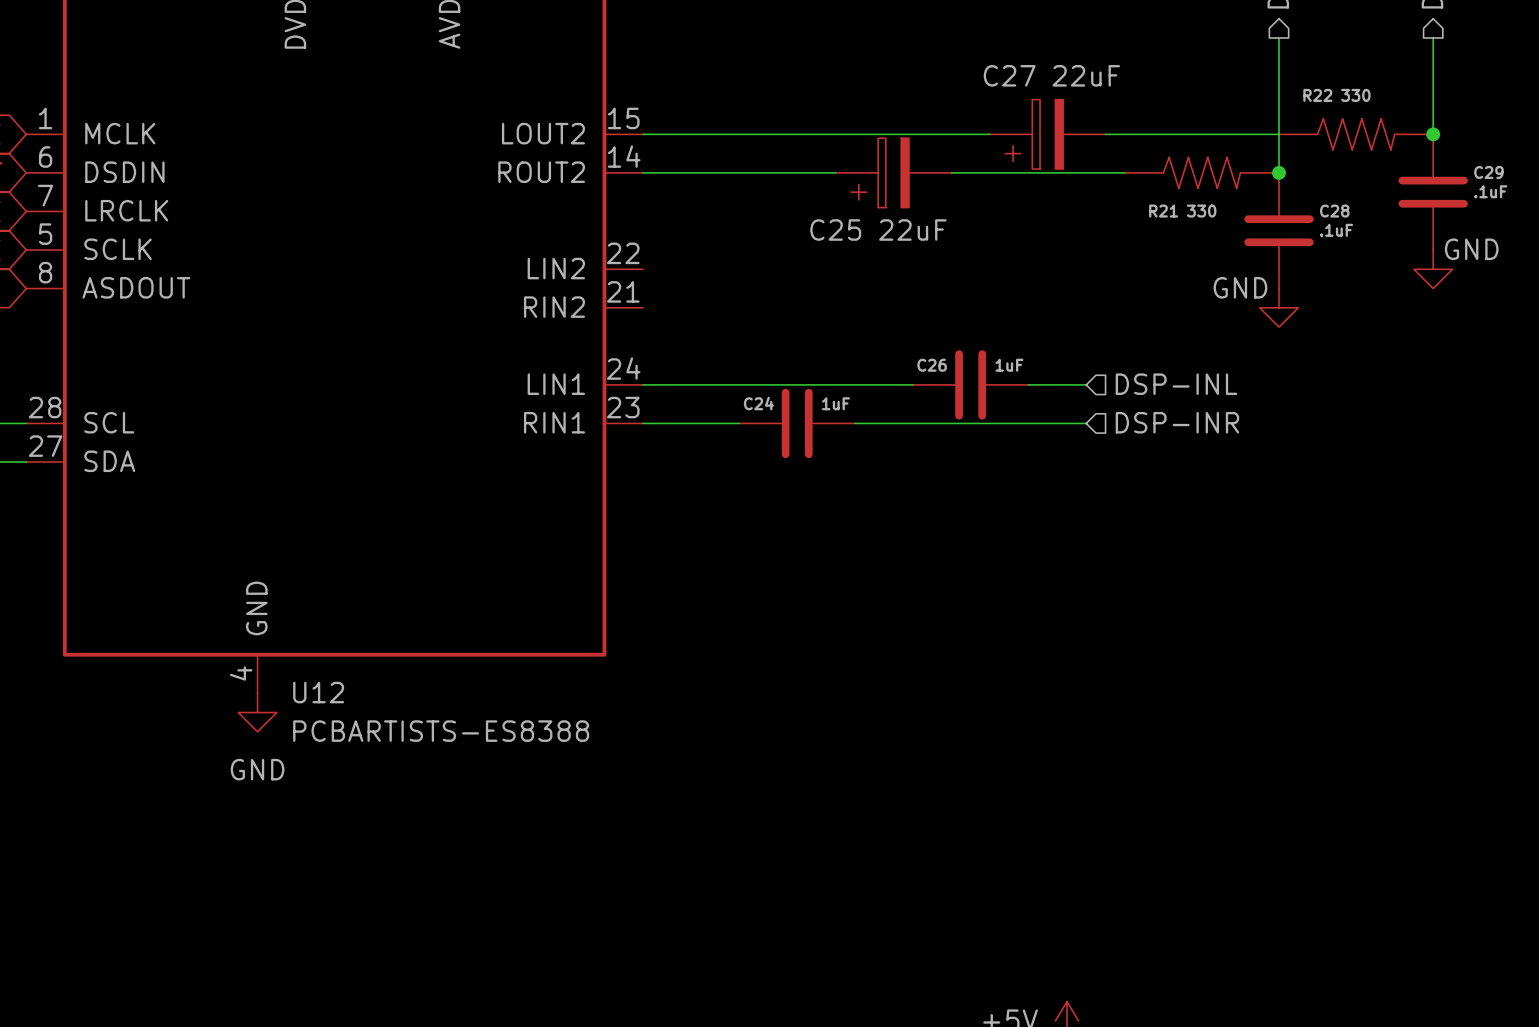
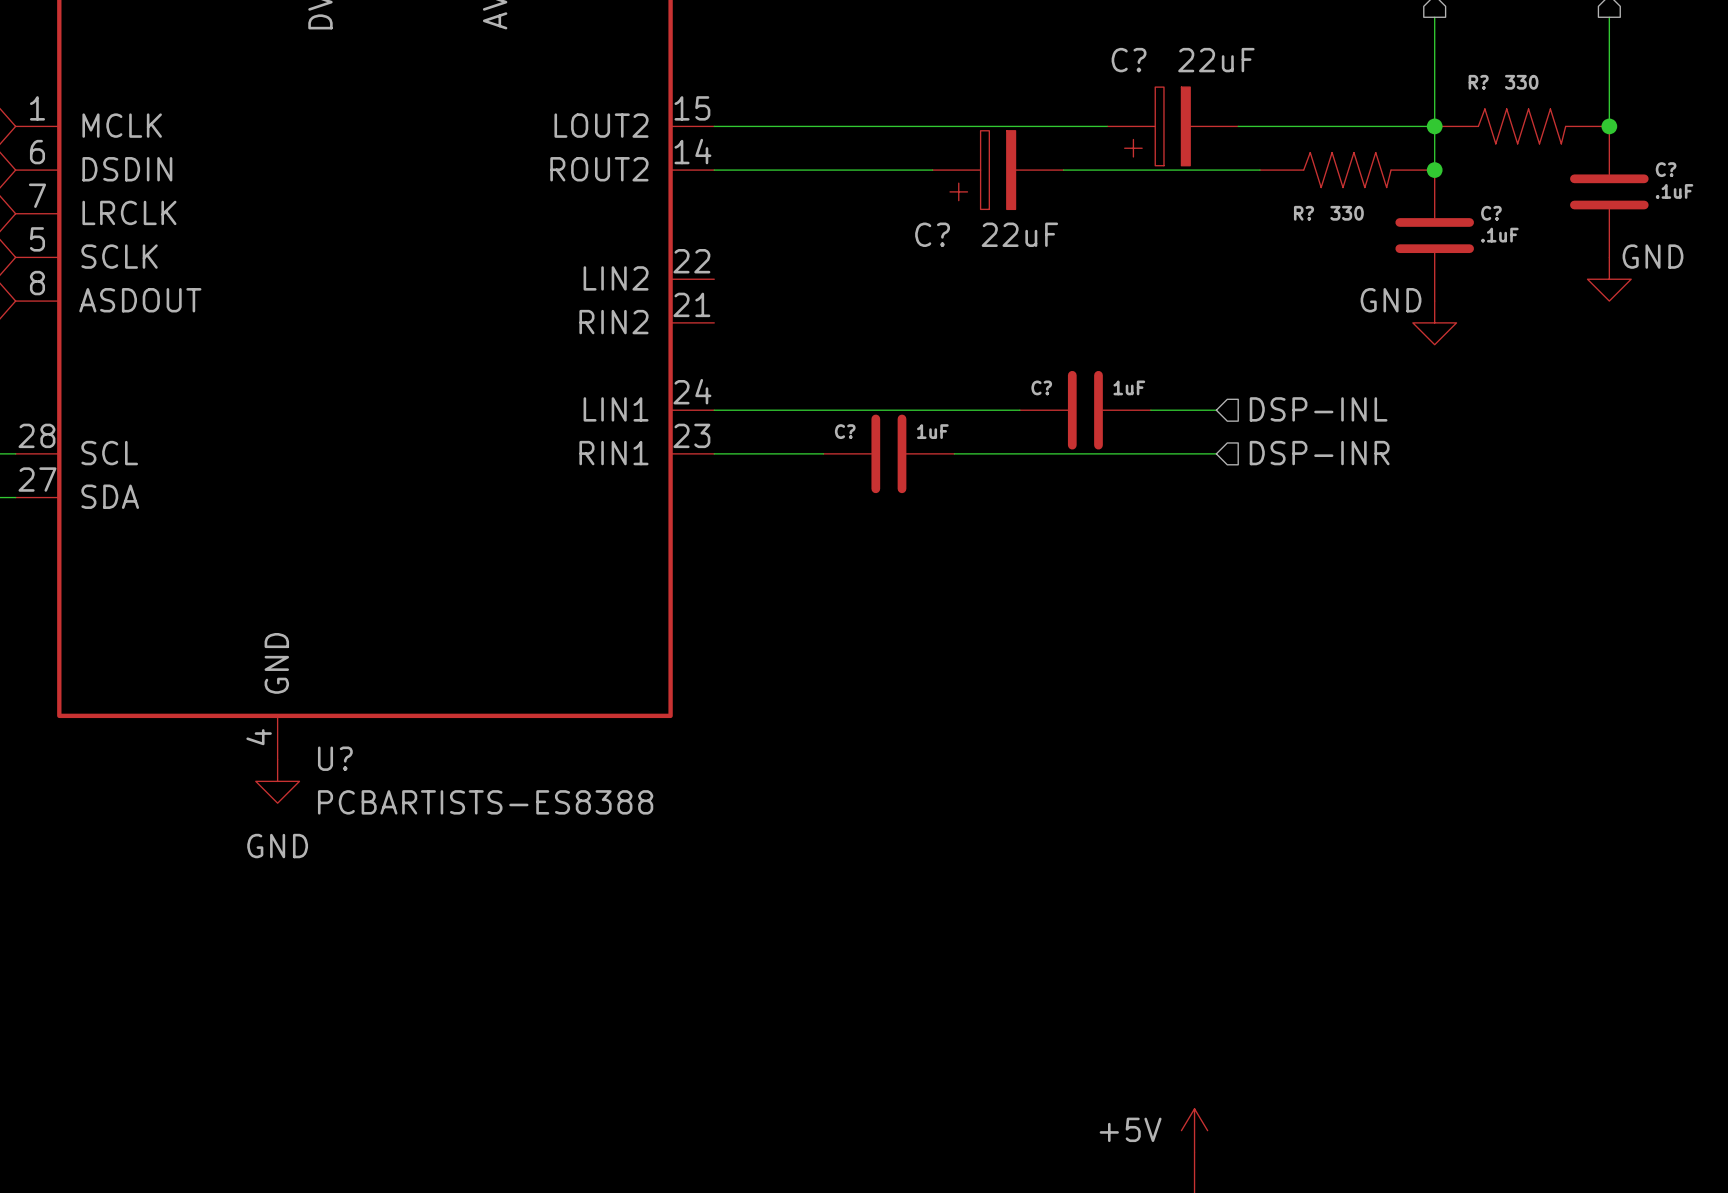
C27 name: C27 (1009, 75) -> C? (1129, 60)
R22 name: R22 (1317, 95) -> R? (1478, 82)
junction: none -> (1434, 126)
C29 name: C29 (1488, 172) -> C? (1666, 169)
R21 name: R21 (1163, 211) -> R? (1303, 213)
C28 name: C28 (1334, 211) -> C? (1491, 213)
C25 name: C25 (835, 230) -> C? (932, 234)
C26 name: C26 (932, 365) -> C? (1041, 387)
C24 name: C24 (758, 403) -> C? (845, 431)
U12 name: U12 (318, 692) -> U? (335, 758)

